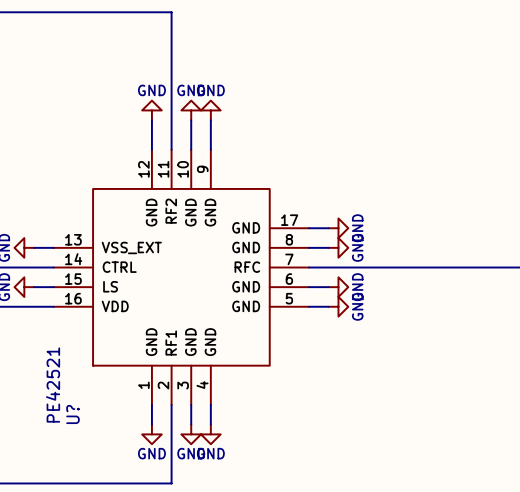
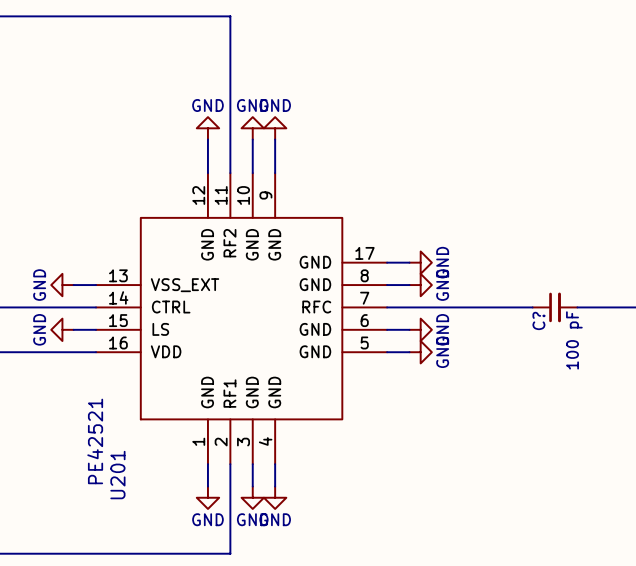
C?: none -> 100 pF (555, 307)
U? name: U? (72, 414) -> U201 (117, 475)

